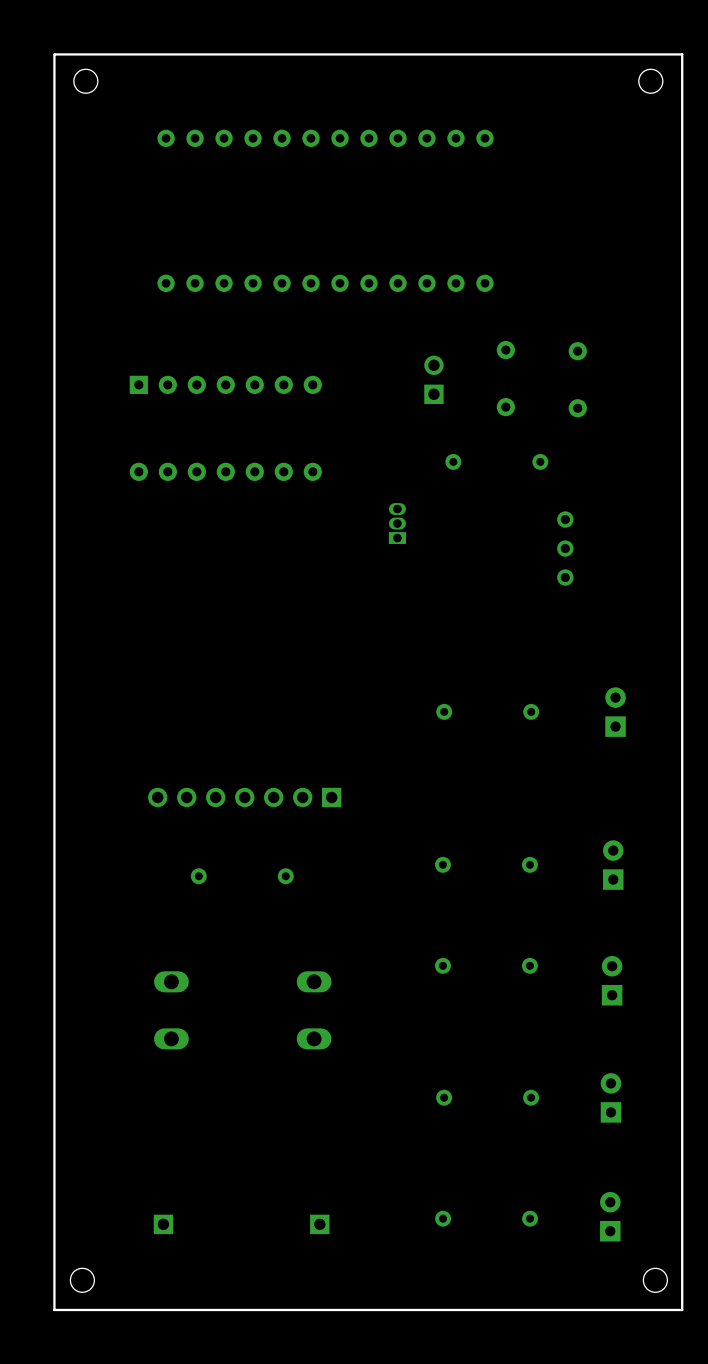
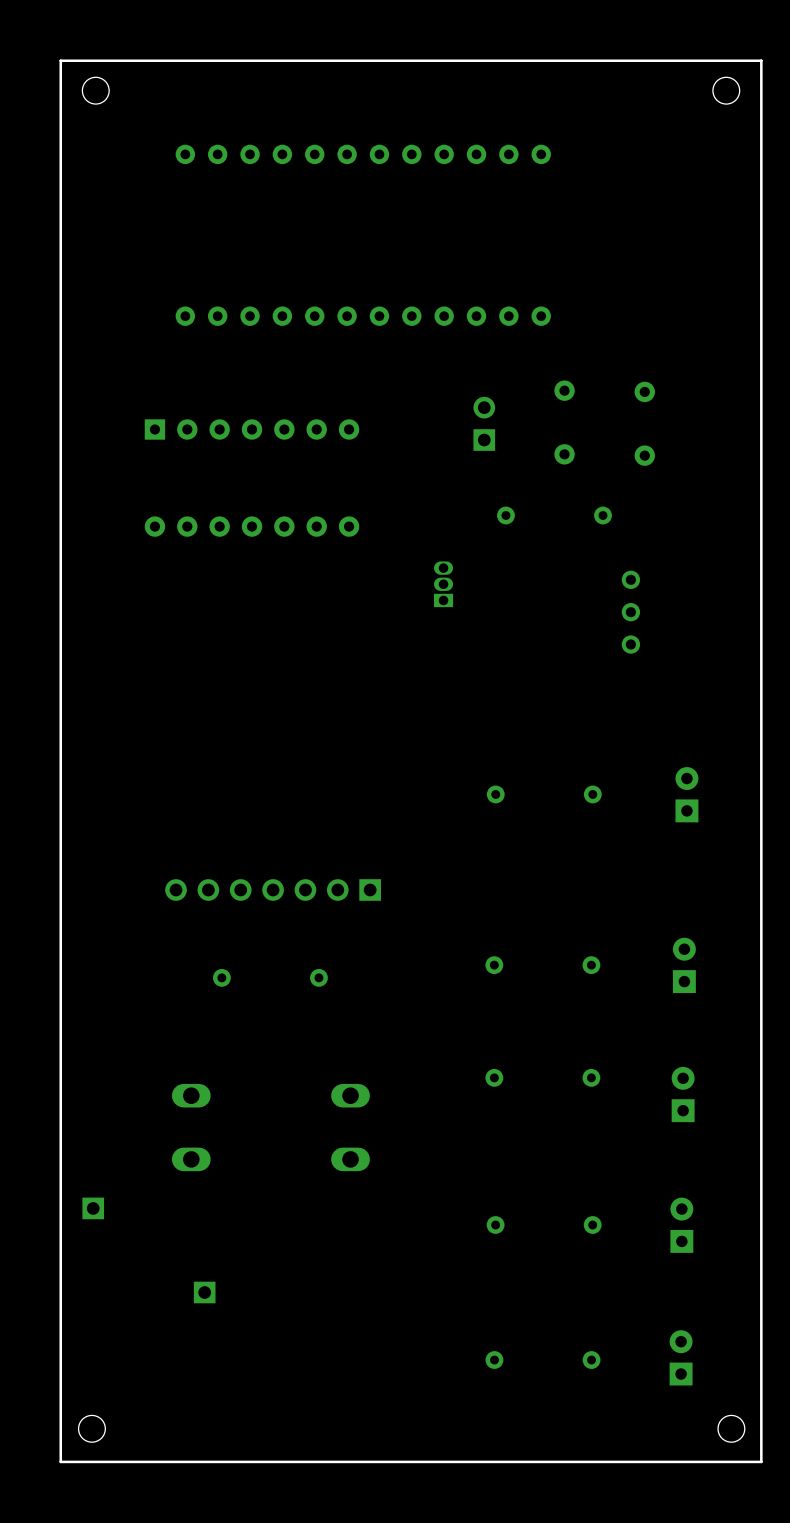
part: none -> (93, 1208)
part position: (163, 1224) -> (204, 1292)
part: (319, 1224) -> none

